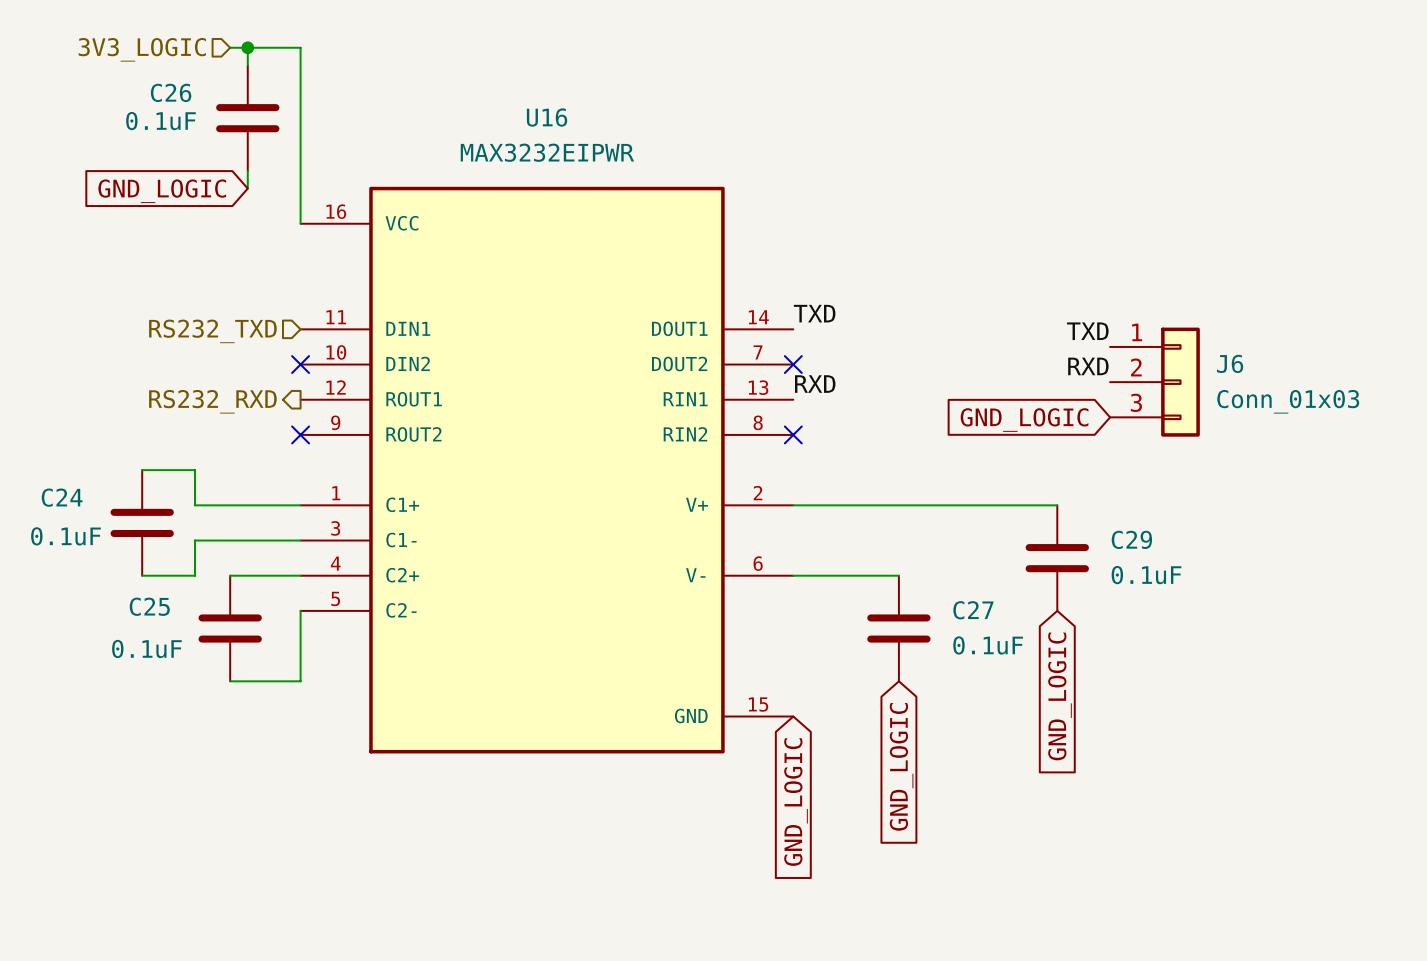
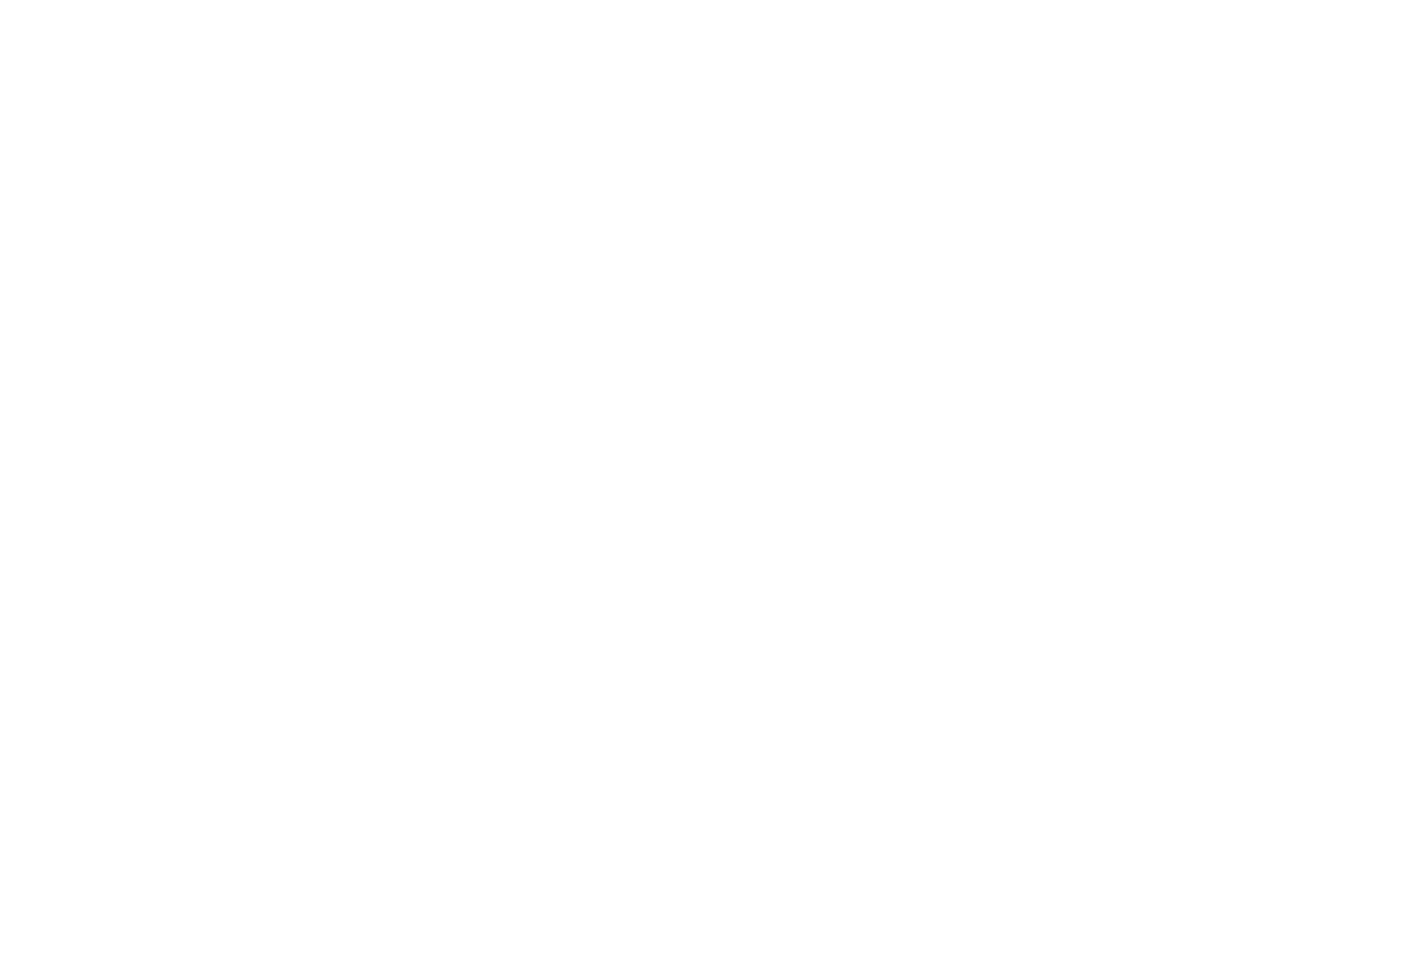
wire: (230, 47) (300, 47) (300, 223) -> none
wire: (247, 47) (247, 65) -> none
junction: (247, 47) -> none
hierarchical label: 3V3_LOGIC (142, 49) -> none
C26: 0.1uF (247, 118) -> none
wire: (247, 170) (247, 188) -> none
global label: GND_LOGIC (162, 191) -> none
label: TXD (814, 313) -> none
hierarchical label: RS232_TXD (212, 331) -> none
label: TXD (1087, 331) -> none
no-connect mark: (300, 364) -> none
no-connect mark: (793, 364) -> none
label: RXD (1088, 366) -> none
J6: Conn_01x03 (1154, 382) -> none
label: RXD (815, 384) -> none
hierarchical label: RS232_RXD (212, 401) -> none
global label: GND_LOGIC (1024, 420) -> none
no-connect mark: (300, 434) -> none
no-connect mark: (793, 434) -> none
wire: (142, 470) (194, 470) (194, 505) (300, 505) -> none
U16: MAX3232EIPWR (546, 470) -> none
wire: (793, 505) (1057, 505) -> none
C24: 0.1uF (142, 522) -> none
wire: (300, 540) (194, 540) (194, 575) (142, 575) -> none
C29: 0.1uF (1057, 558) -> none
wire: (230, 575) (300, 575) -> none
wire: (793, 575) (898, 575) -> none
wire: (300, 610) (300, 681) (230, 681) -> none
C25: 0.1uF (230, 628) -> none
C27: 0.1uF (898, 628) -> none
global label: GND_LOGIC (1059, 696) -> none
global label: GND_LOGIC (901, 766) -> none
global label: GND_LOGIC (796, 802) -> none

